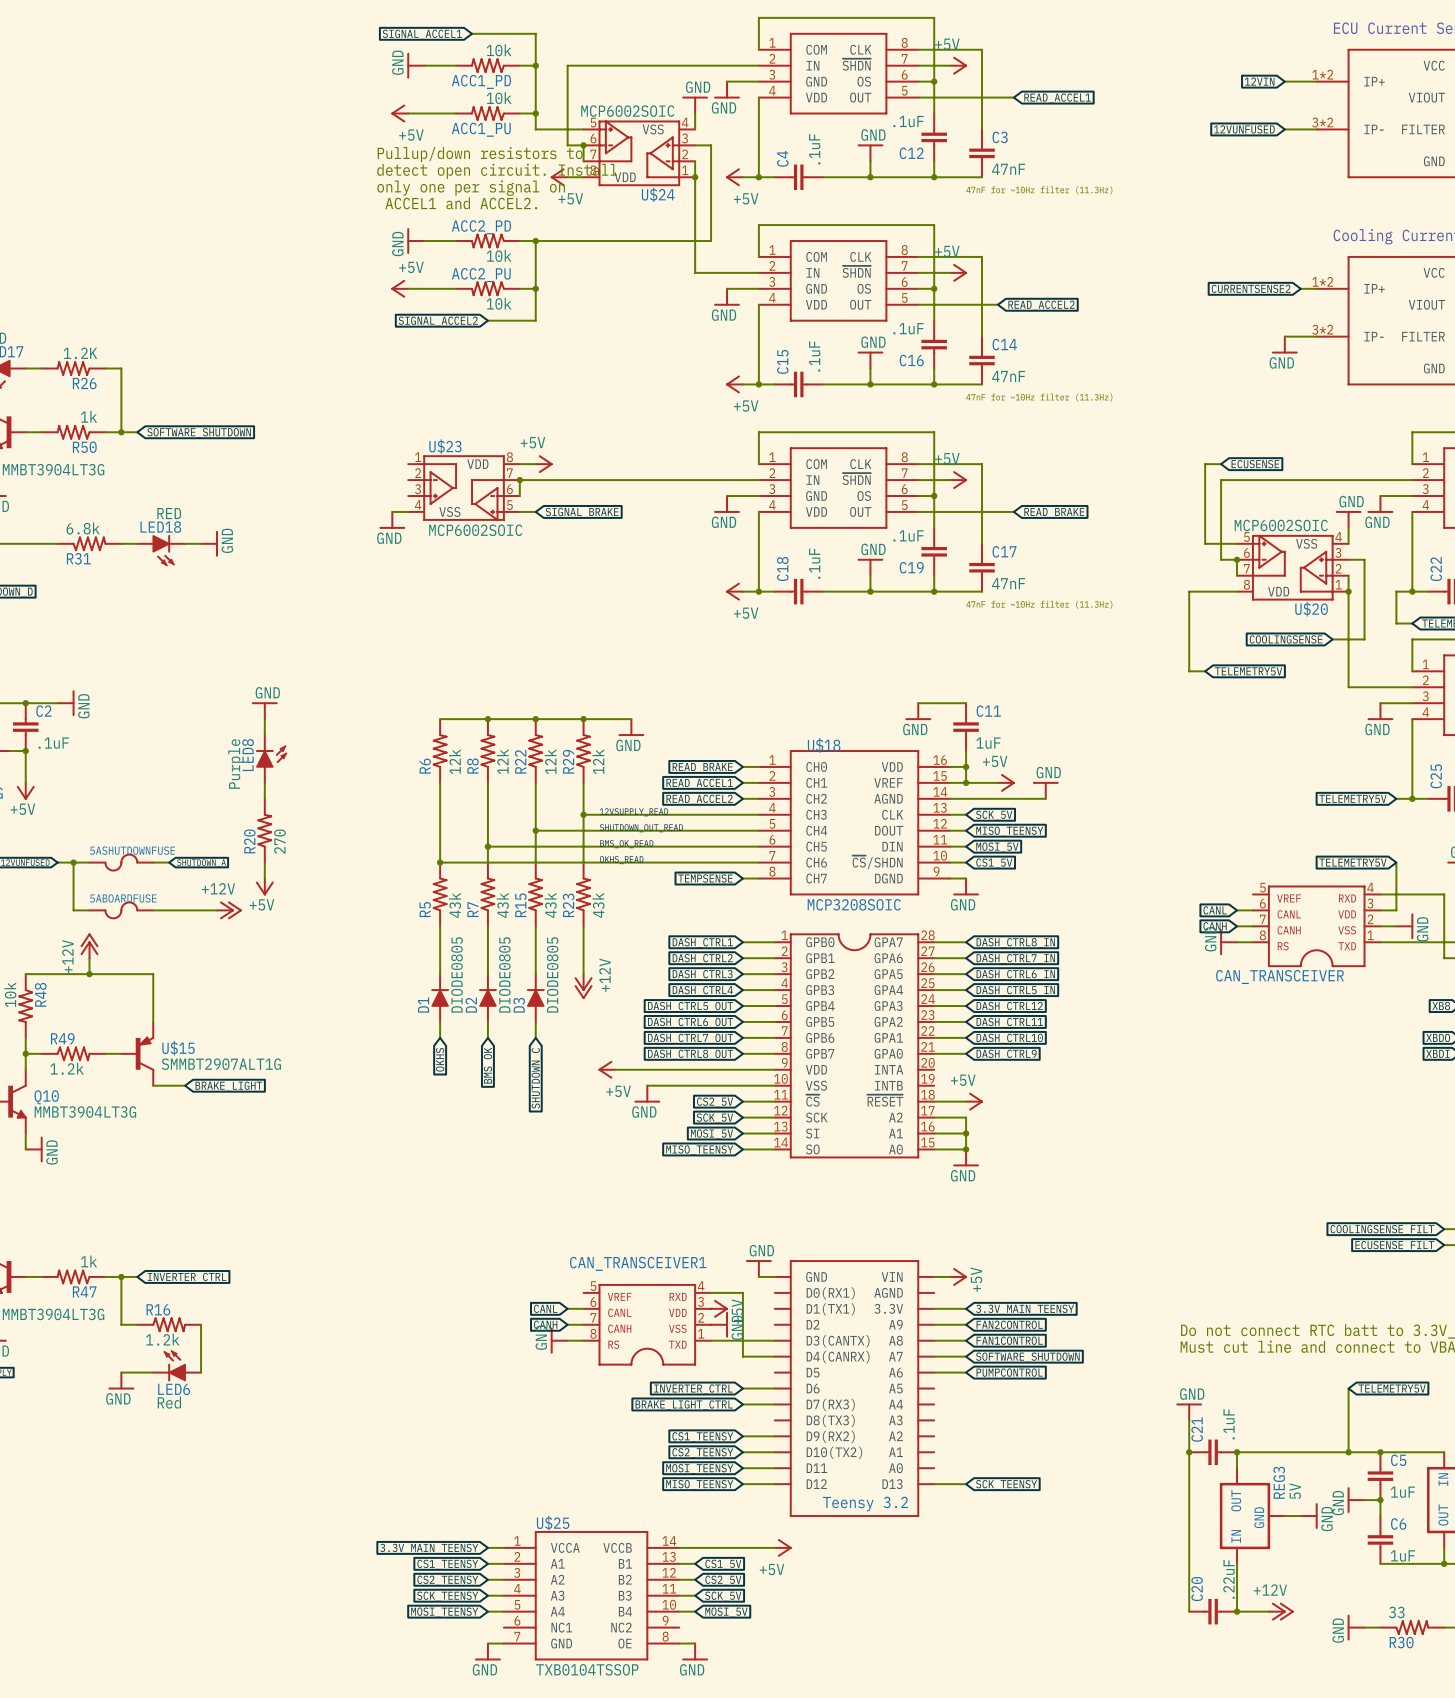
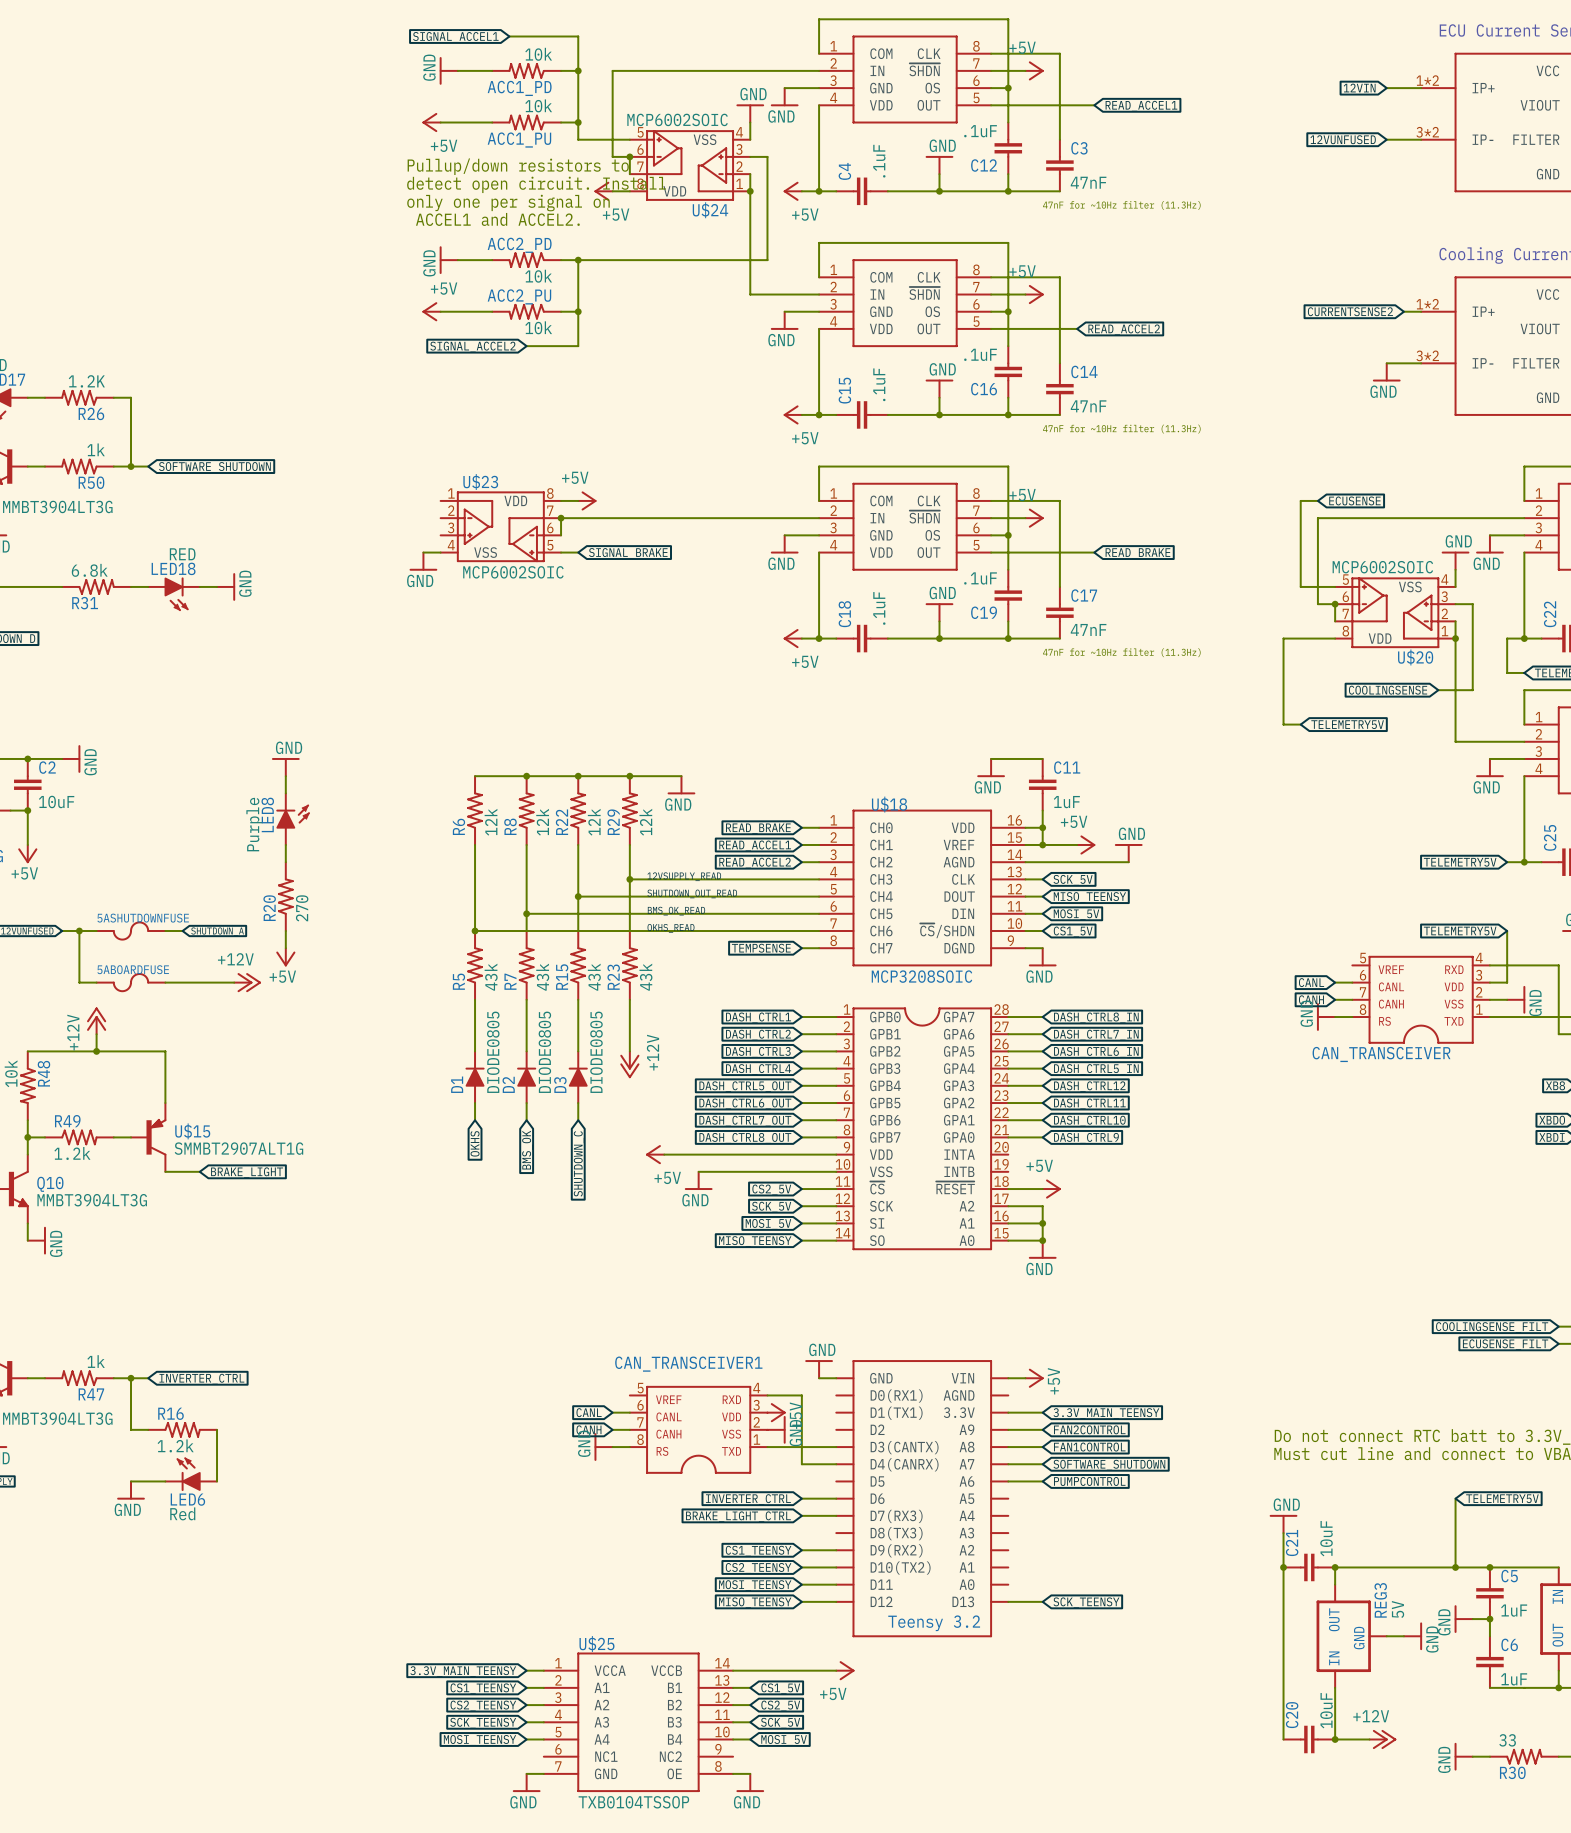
C2 value: .1uF (53, 743) -> 10uF (56, 801)
C21 value: .1uF (1229, 1424) -> 10uF (1326, 1538)
C20 value: .22uF (1229, 1579) -> 10uF (1326, 1710)

